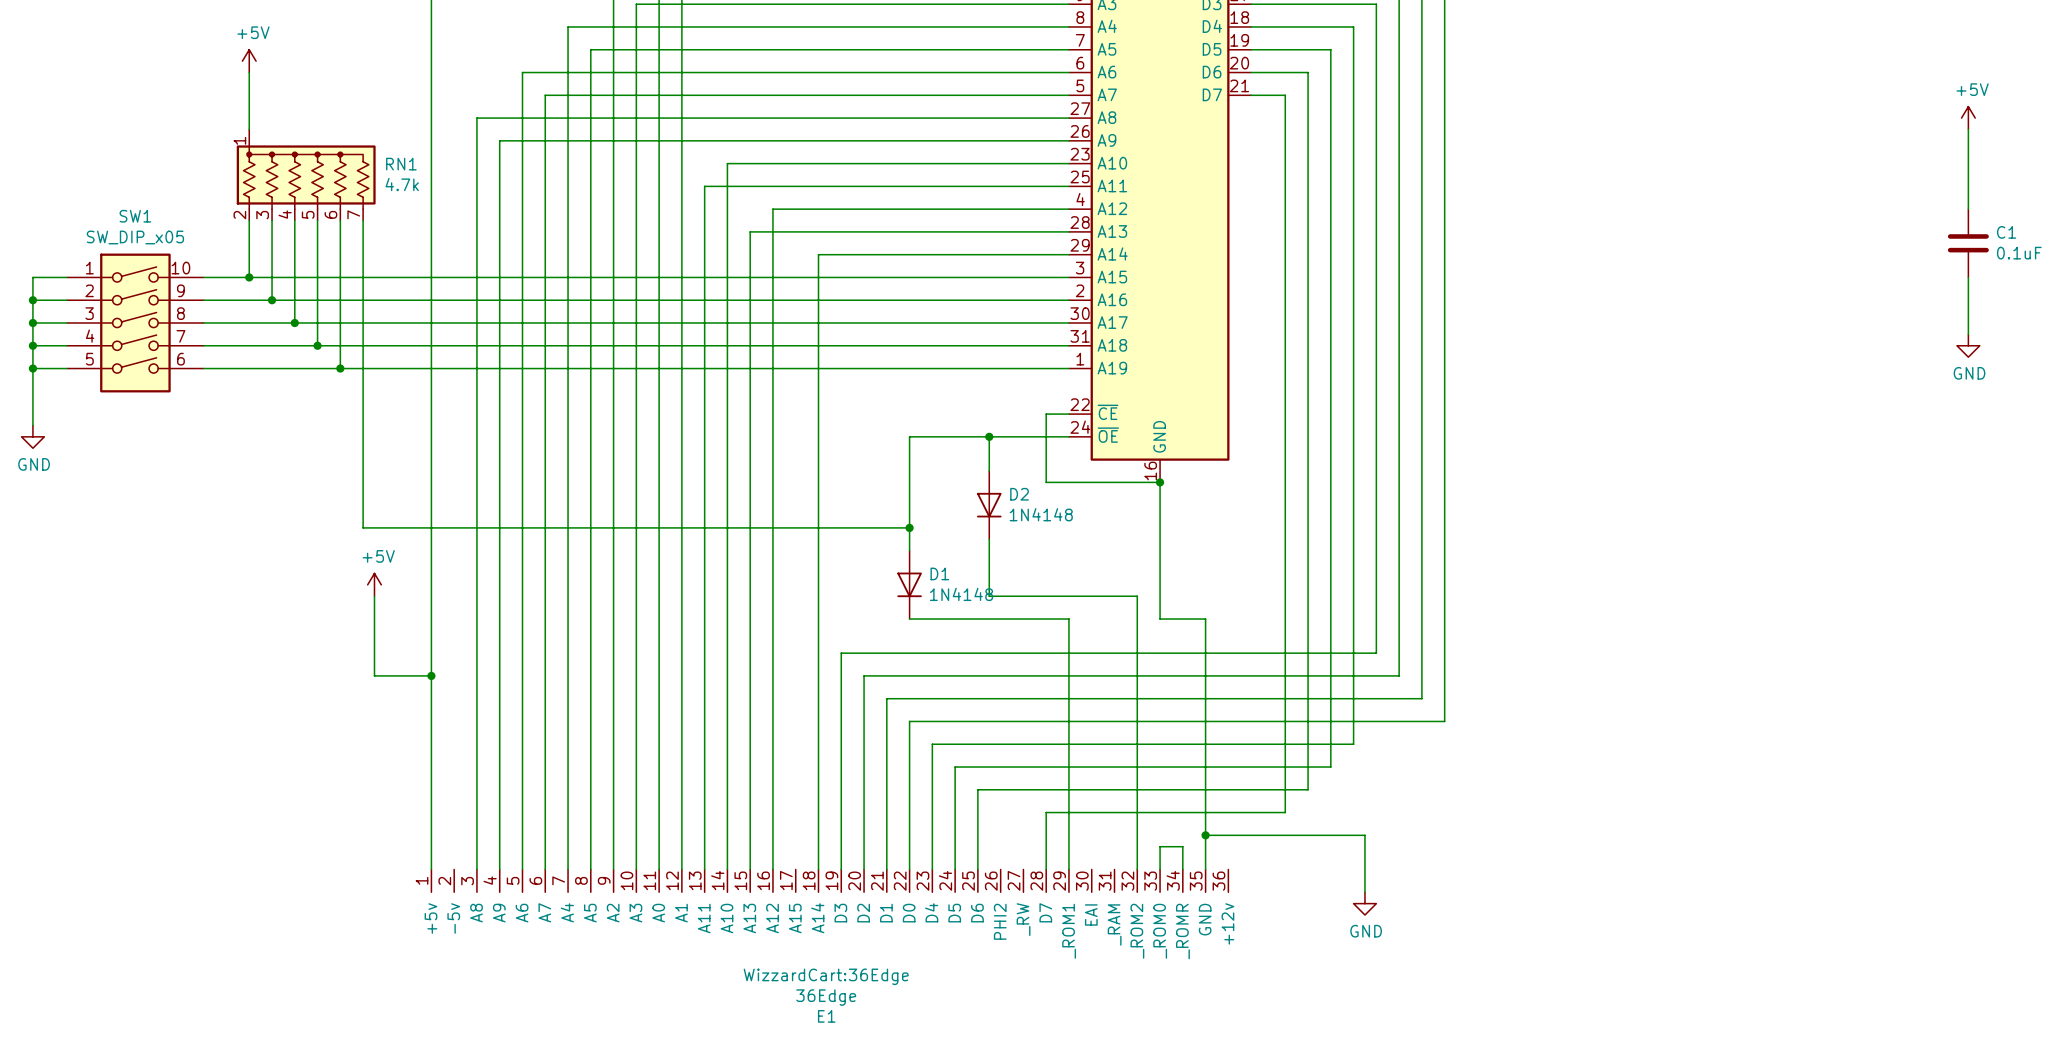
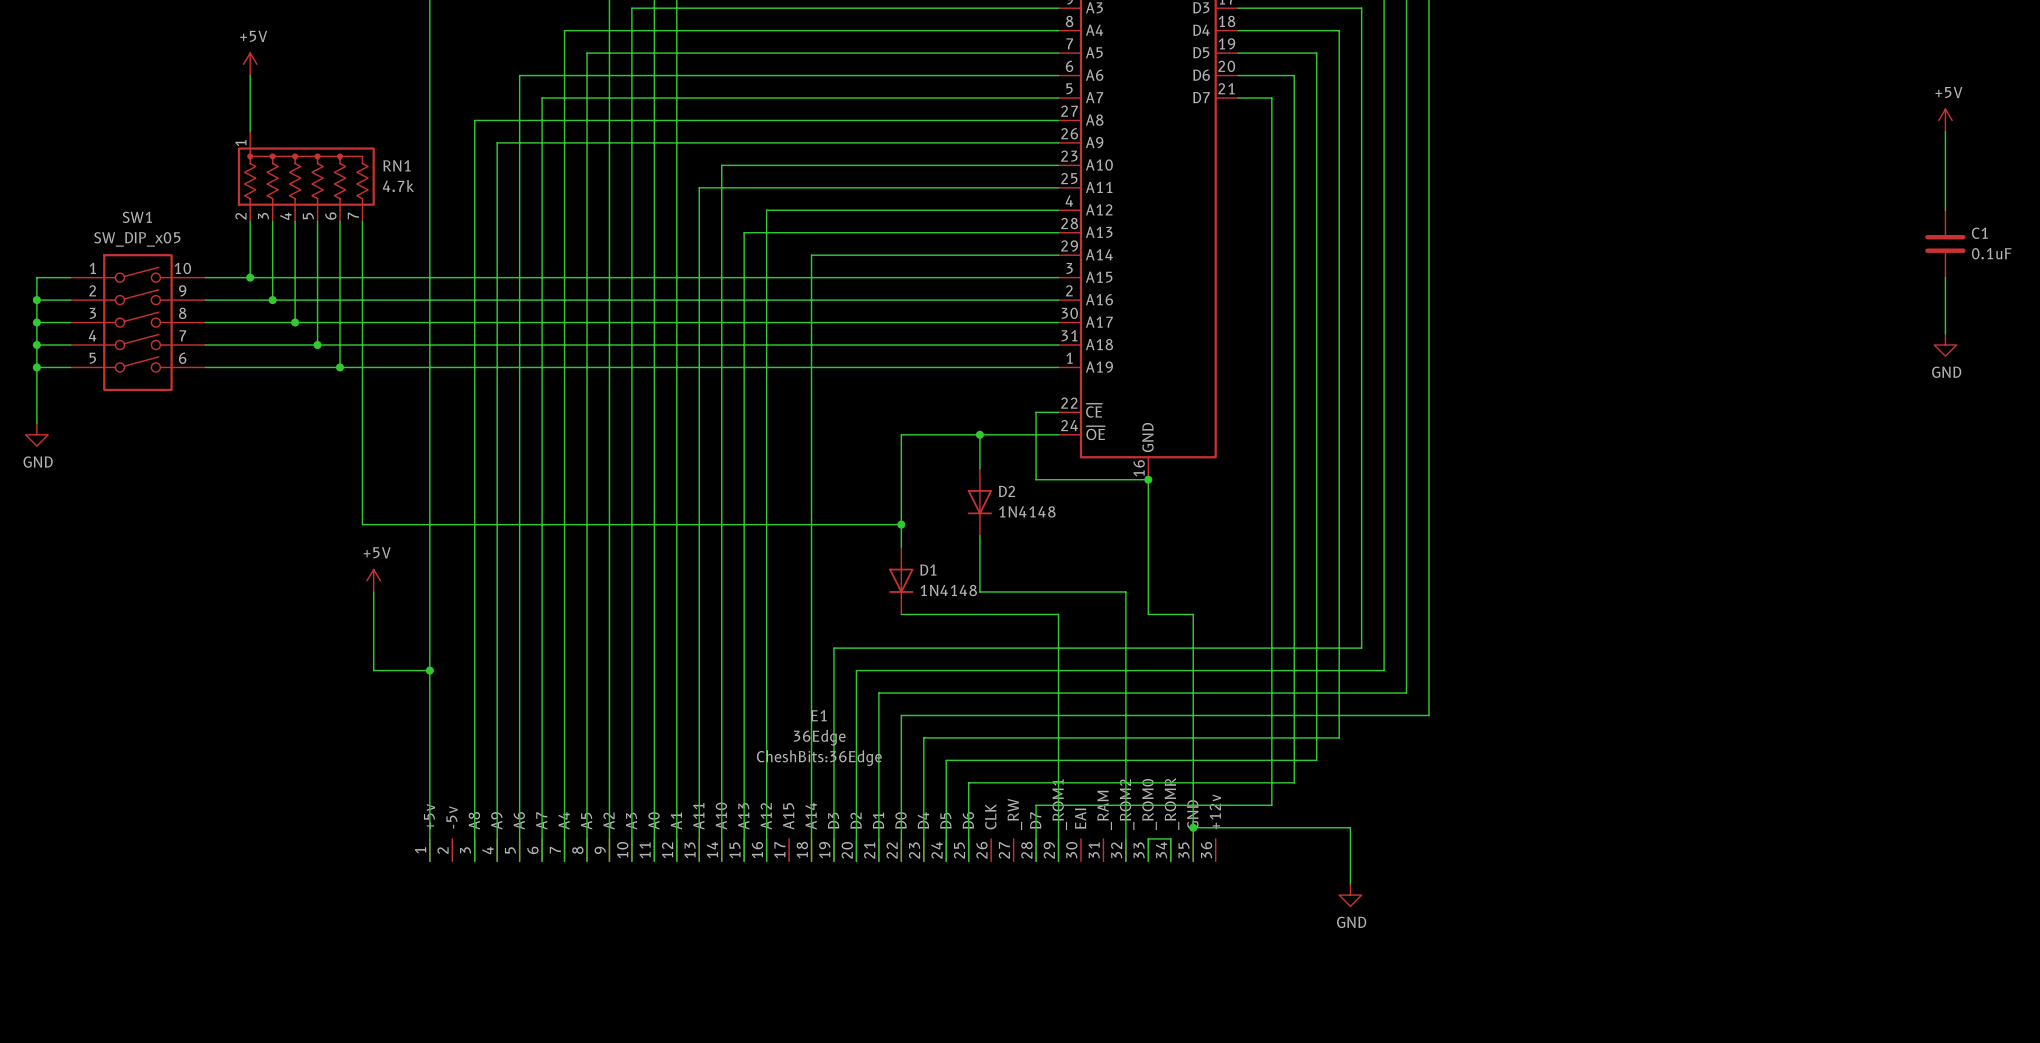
E1 symbol: [431, 869, 1229, 893] -> [429, 838, 1216, 862]
E1 text: WizzardCart:36Edge (826, 976) -> CheshBits:36Edge (819, 758)
E1 value position: 36Edge (826, 997) -> 36Edge (819, 737)
E1 name position: E1 (826, 1016) -> E1 (819, 715)

